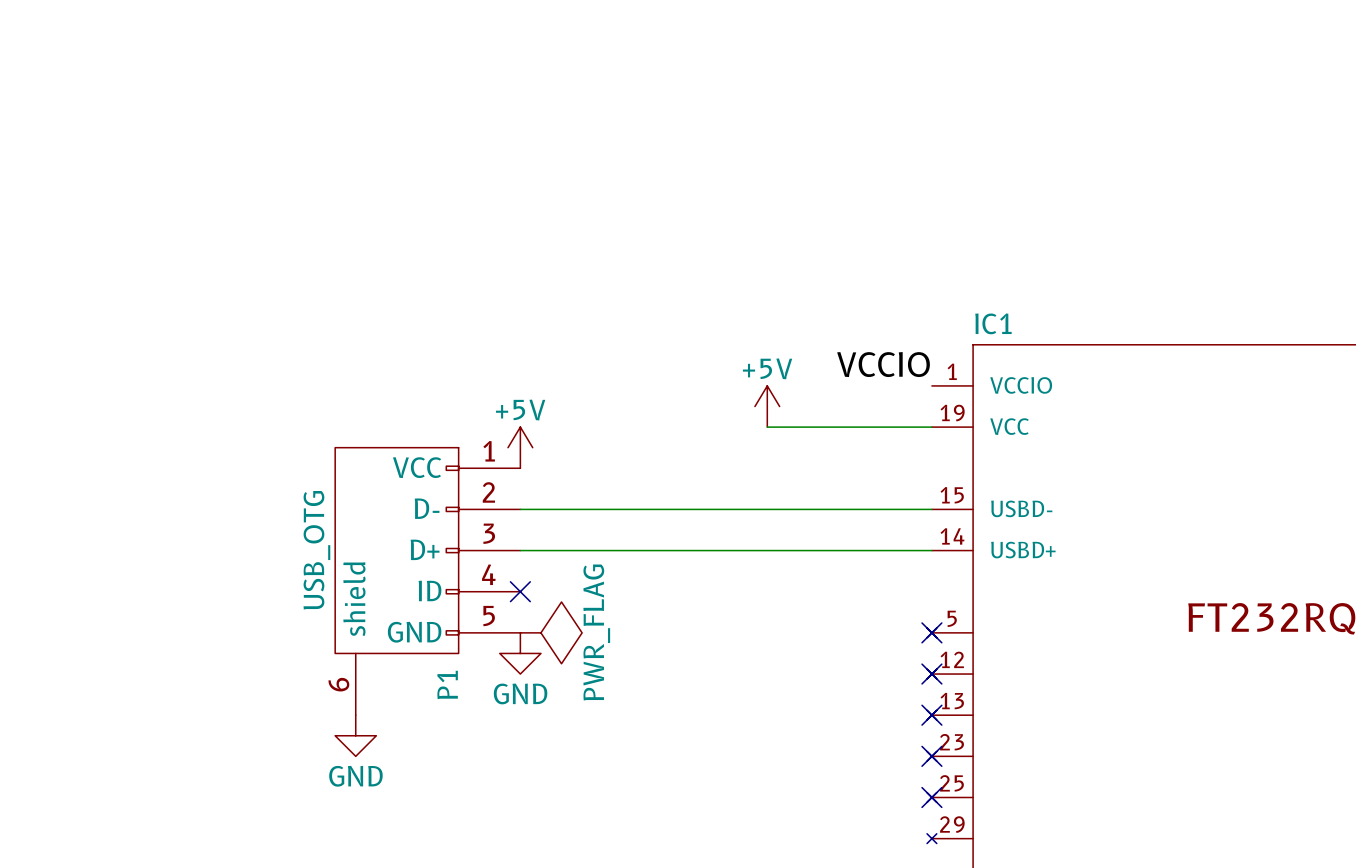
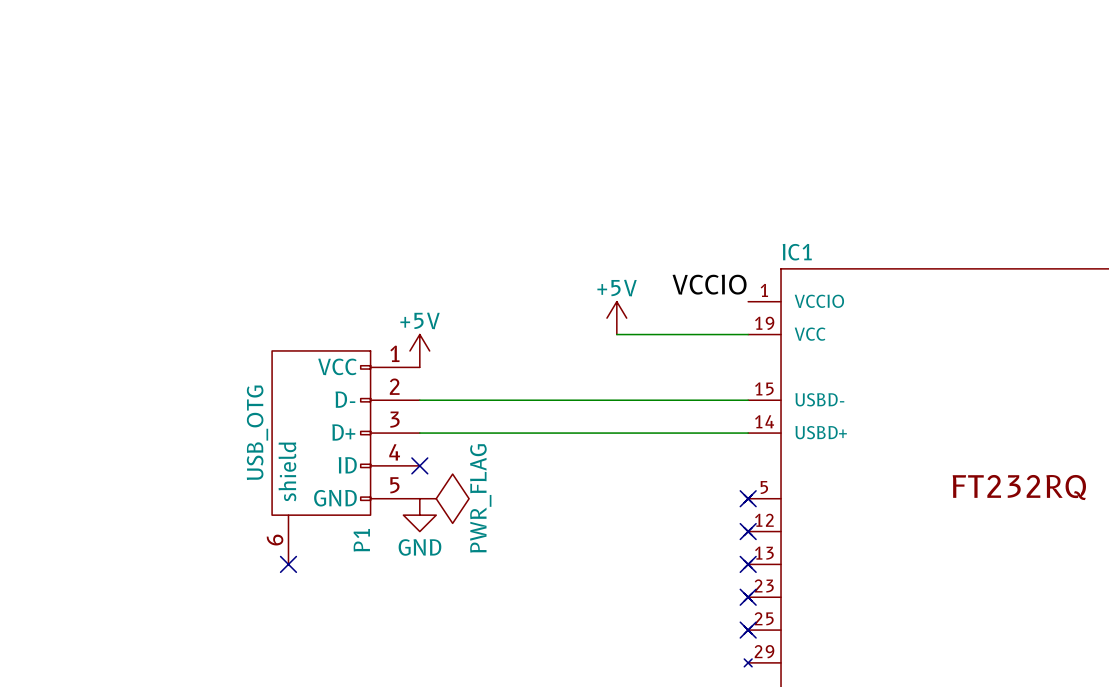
no-connect mark: none -> (288, 564)
power symbol: GND (355, 735) -> none

